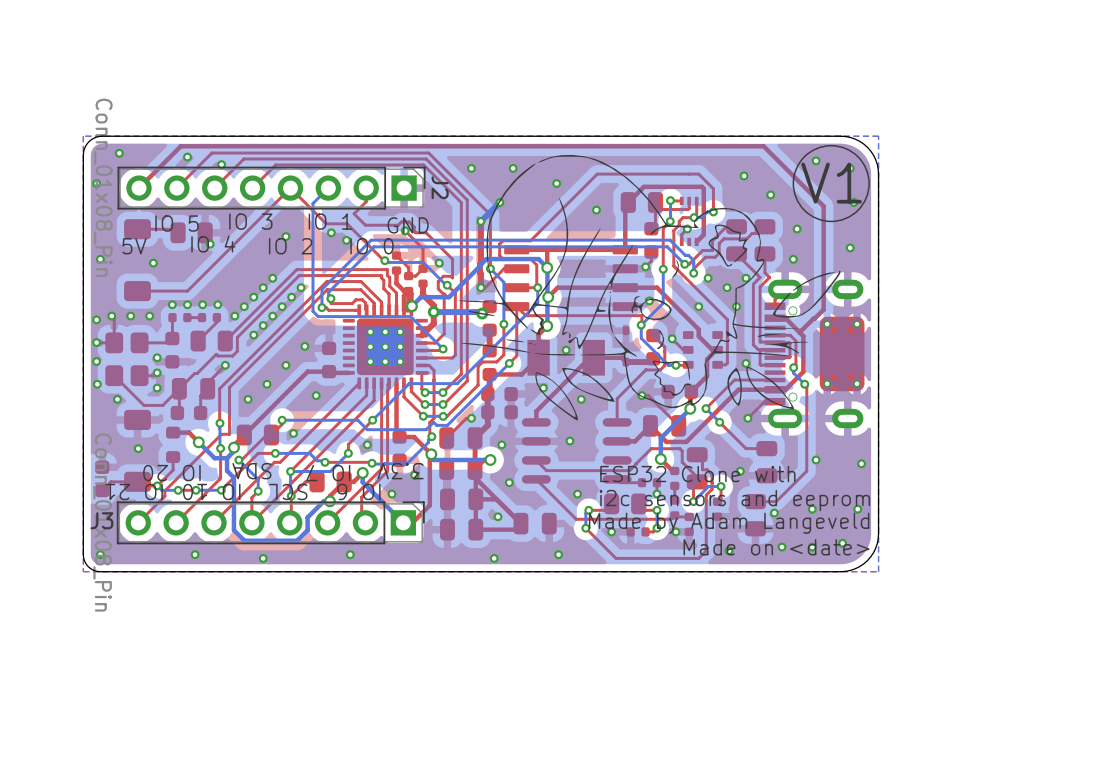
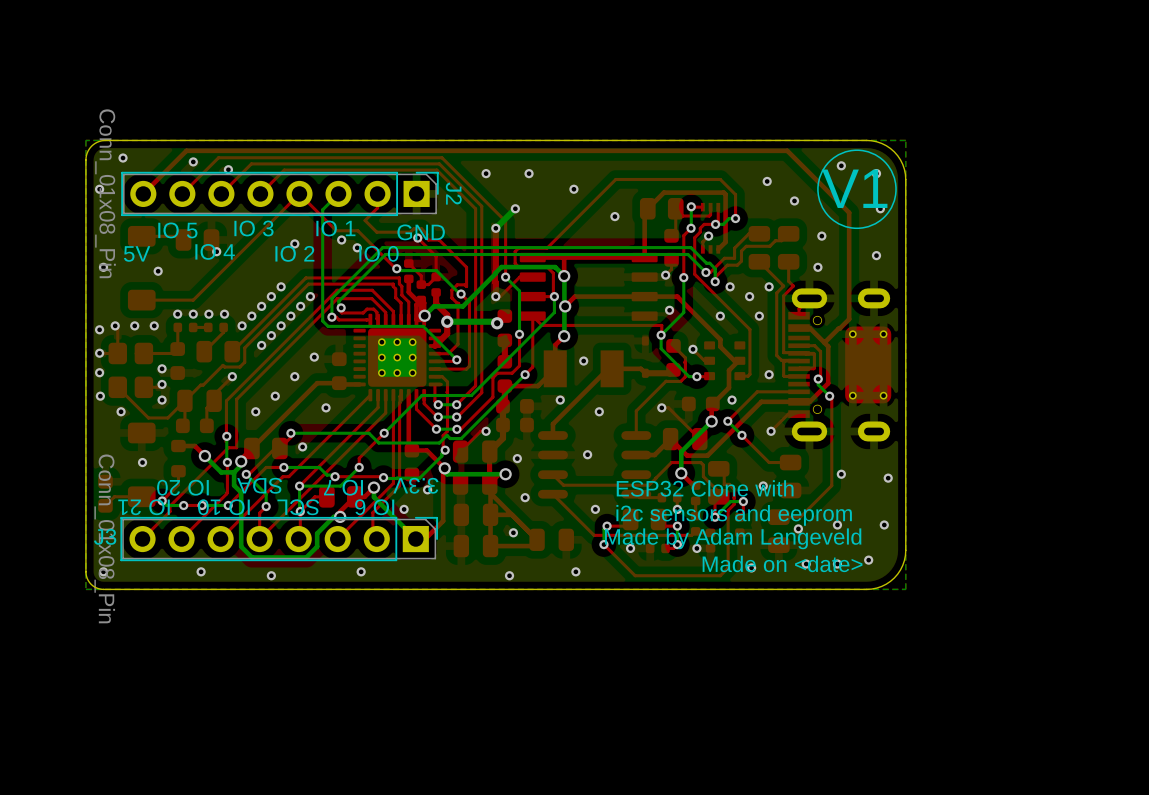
drawing: [458, 154, 841, 421] -> none
via: (439, 263) -> none
via: none -> (732, 400)
via: (367, 444) -> none

